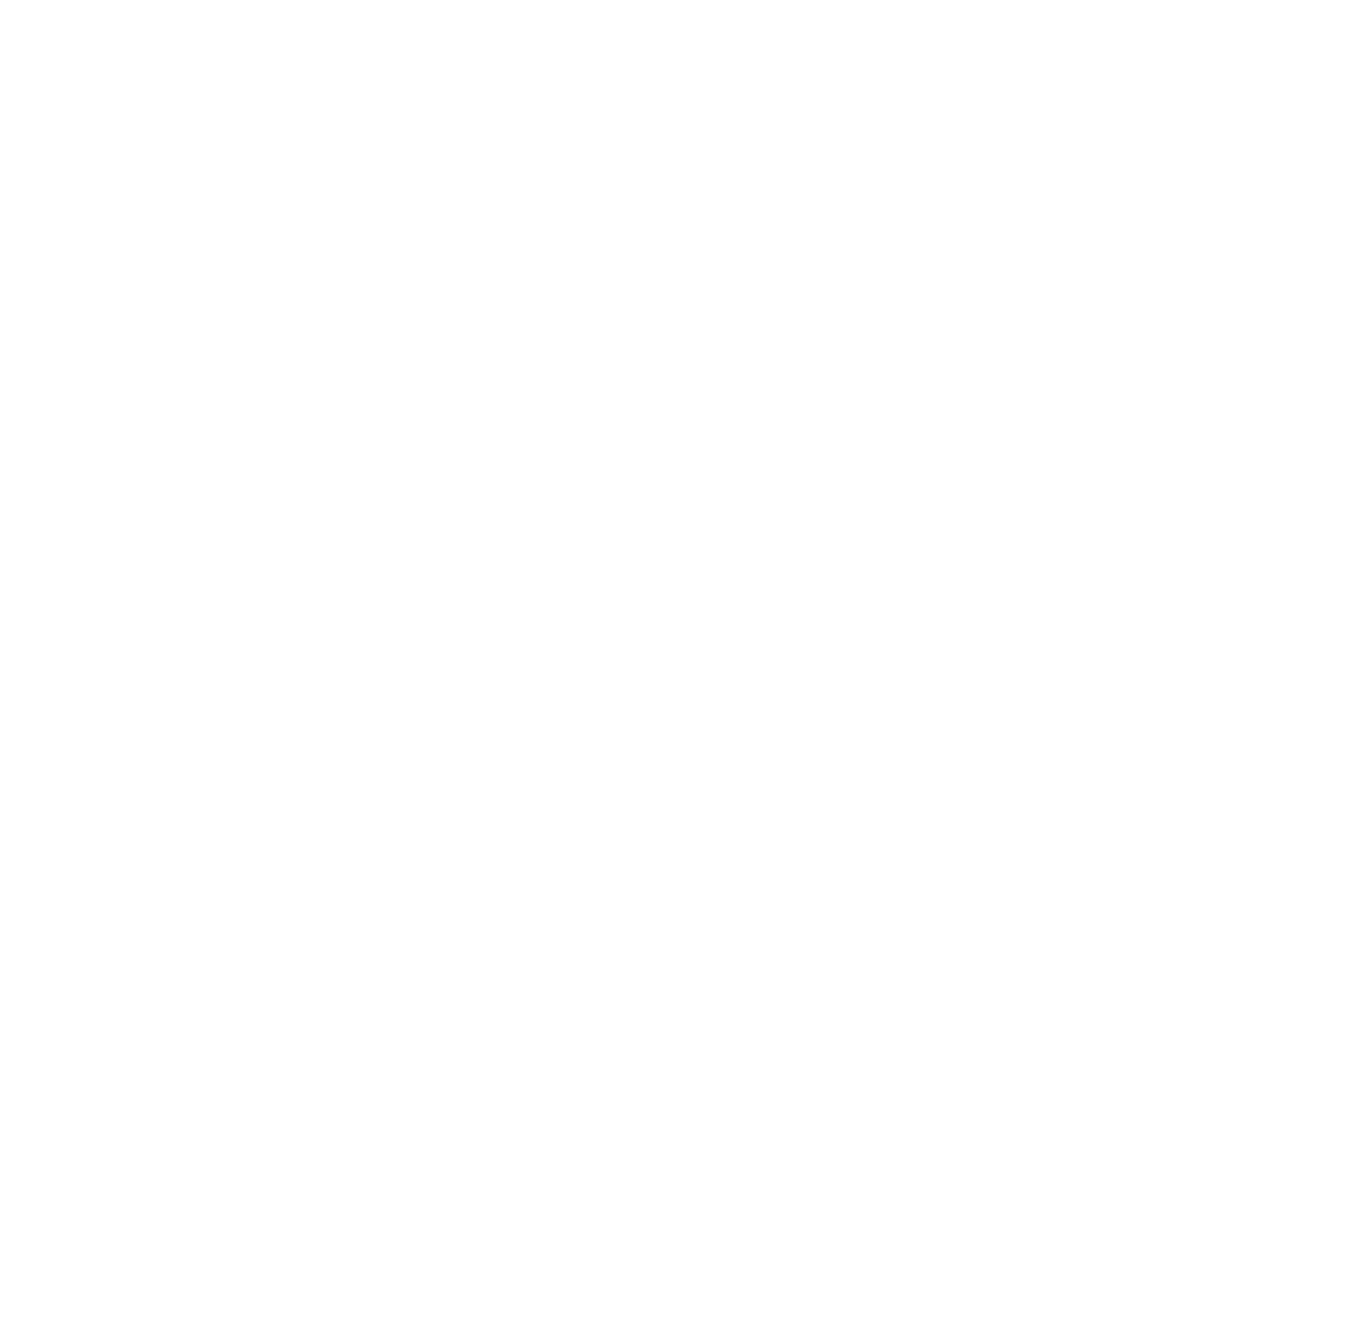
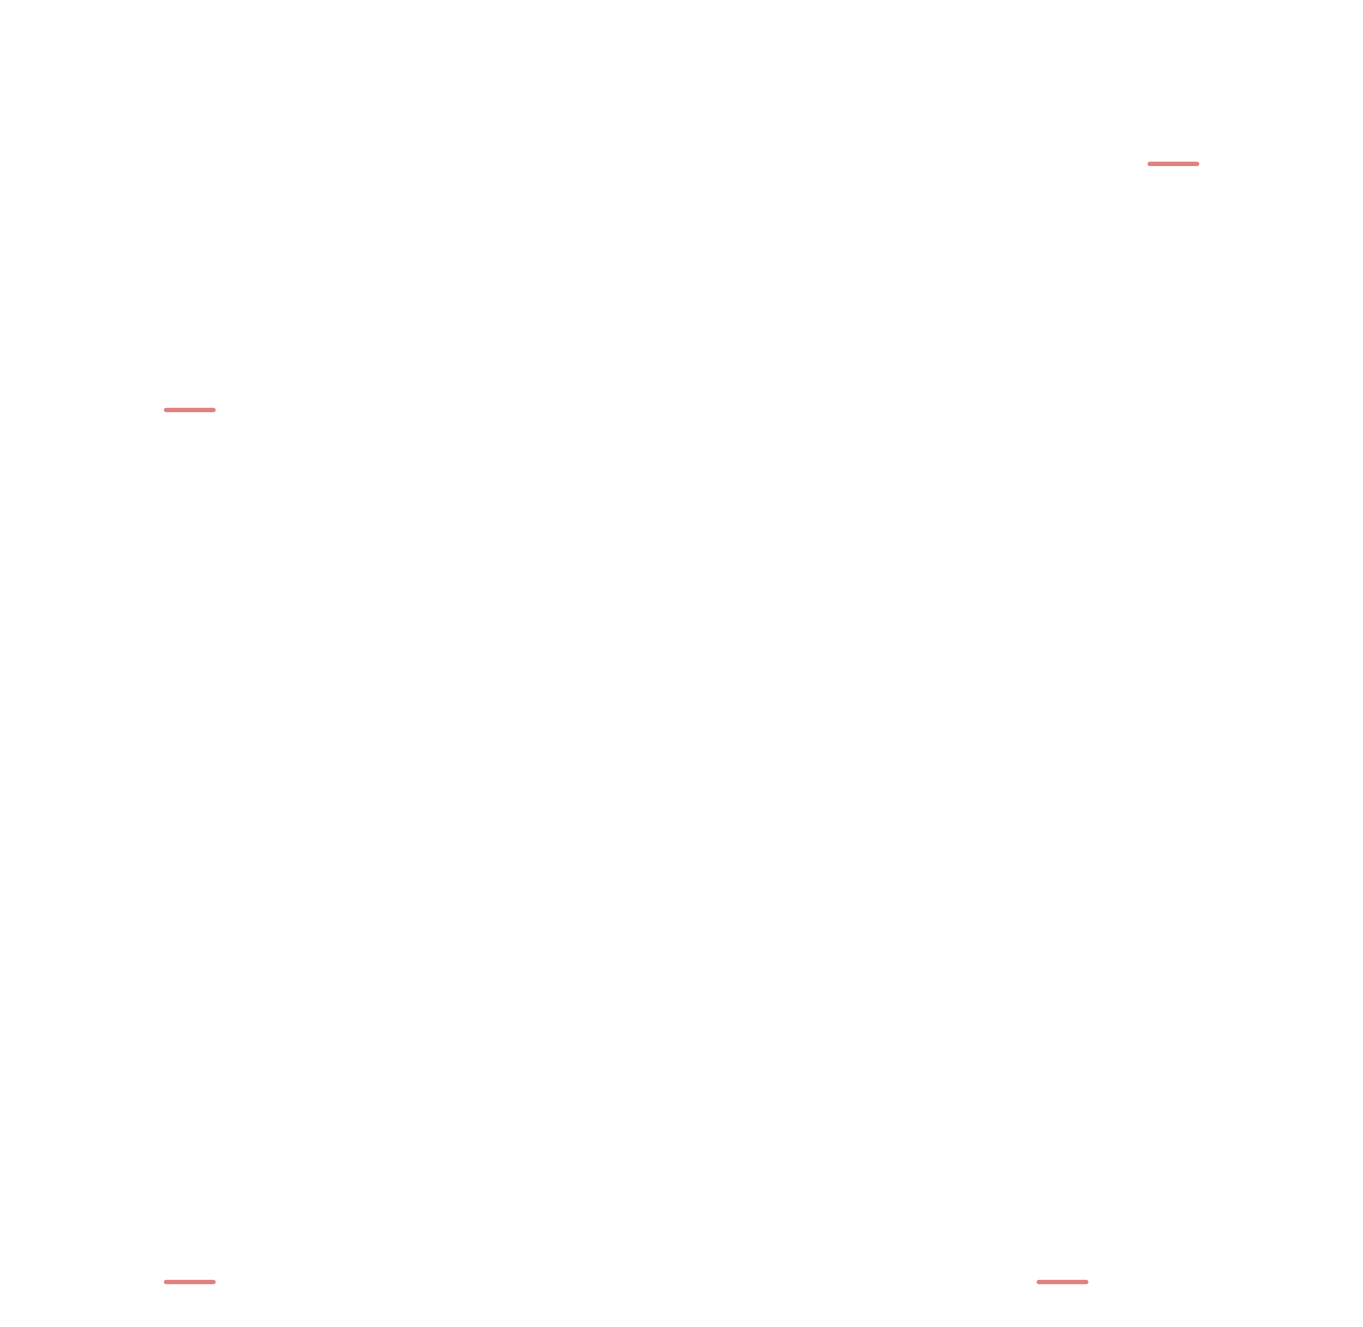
track: none -> (1149, 163) (1197, 163)
track: none -> (166, 410) (213, 410)
track: none -> (166, 1282) (213, 1282)
track: none -> (1038, 1282) (1086, 1282)

